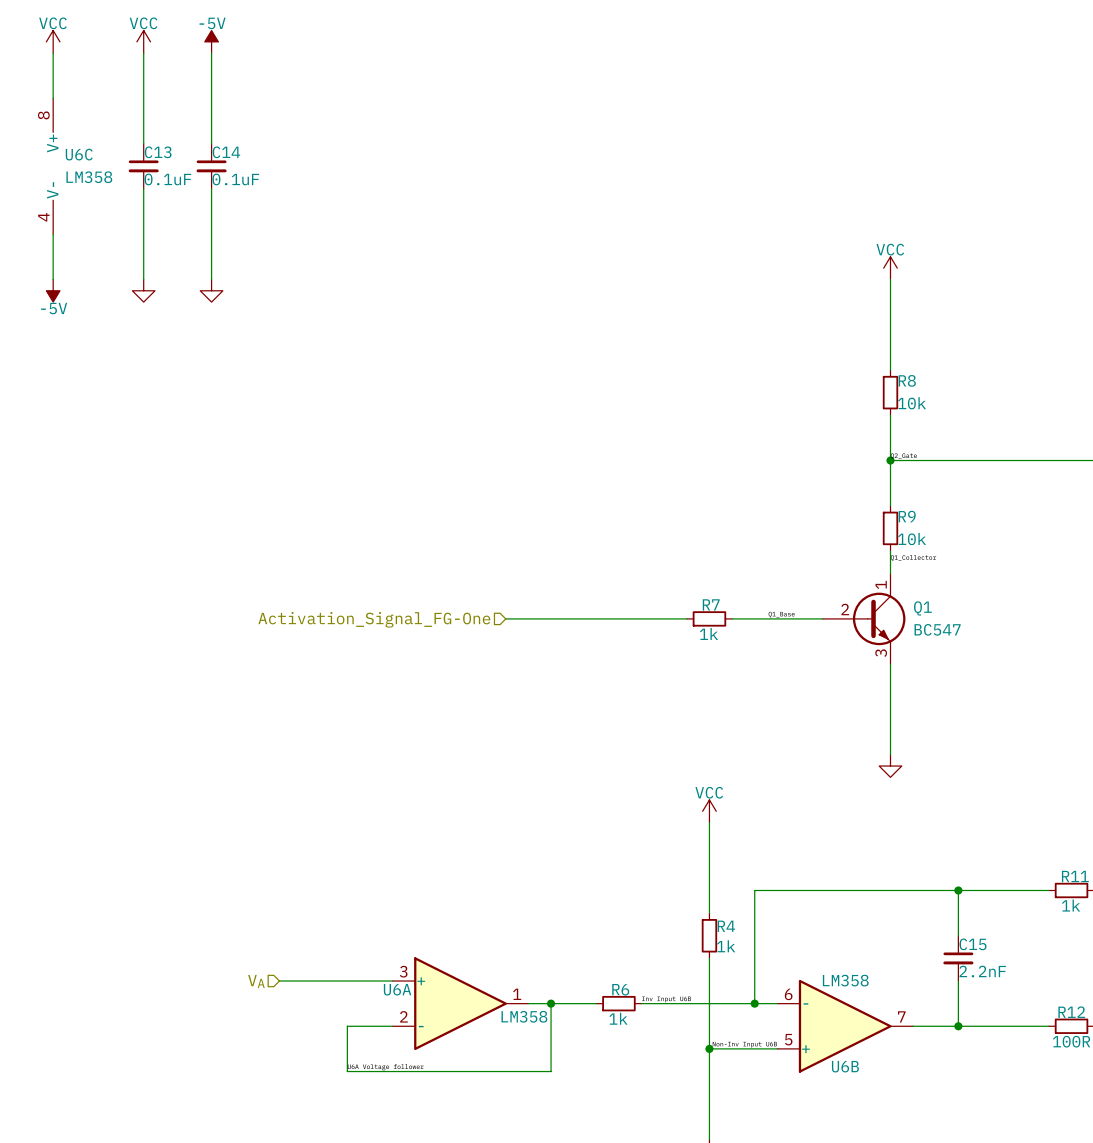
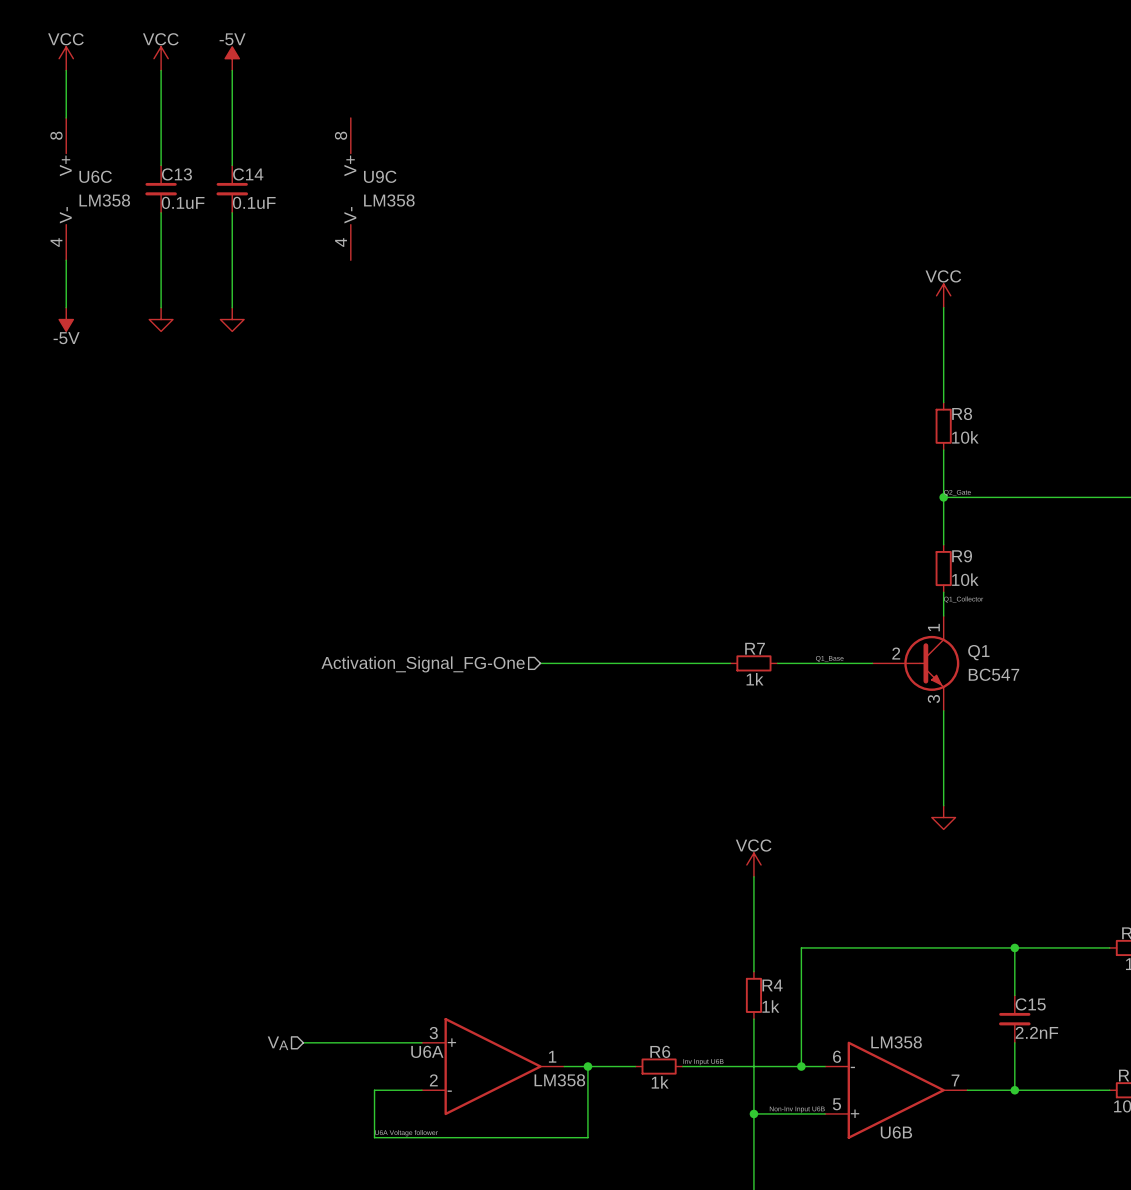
U9C: none -> LM358 (350, 189)

